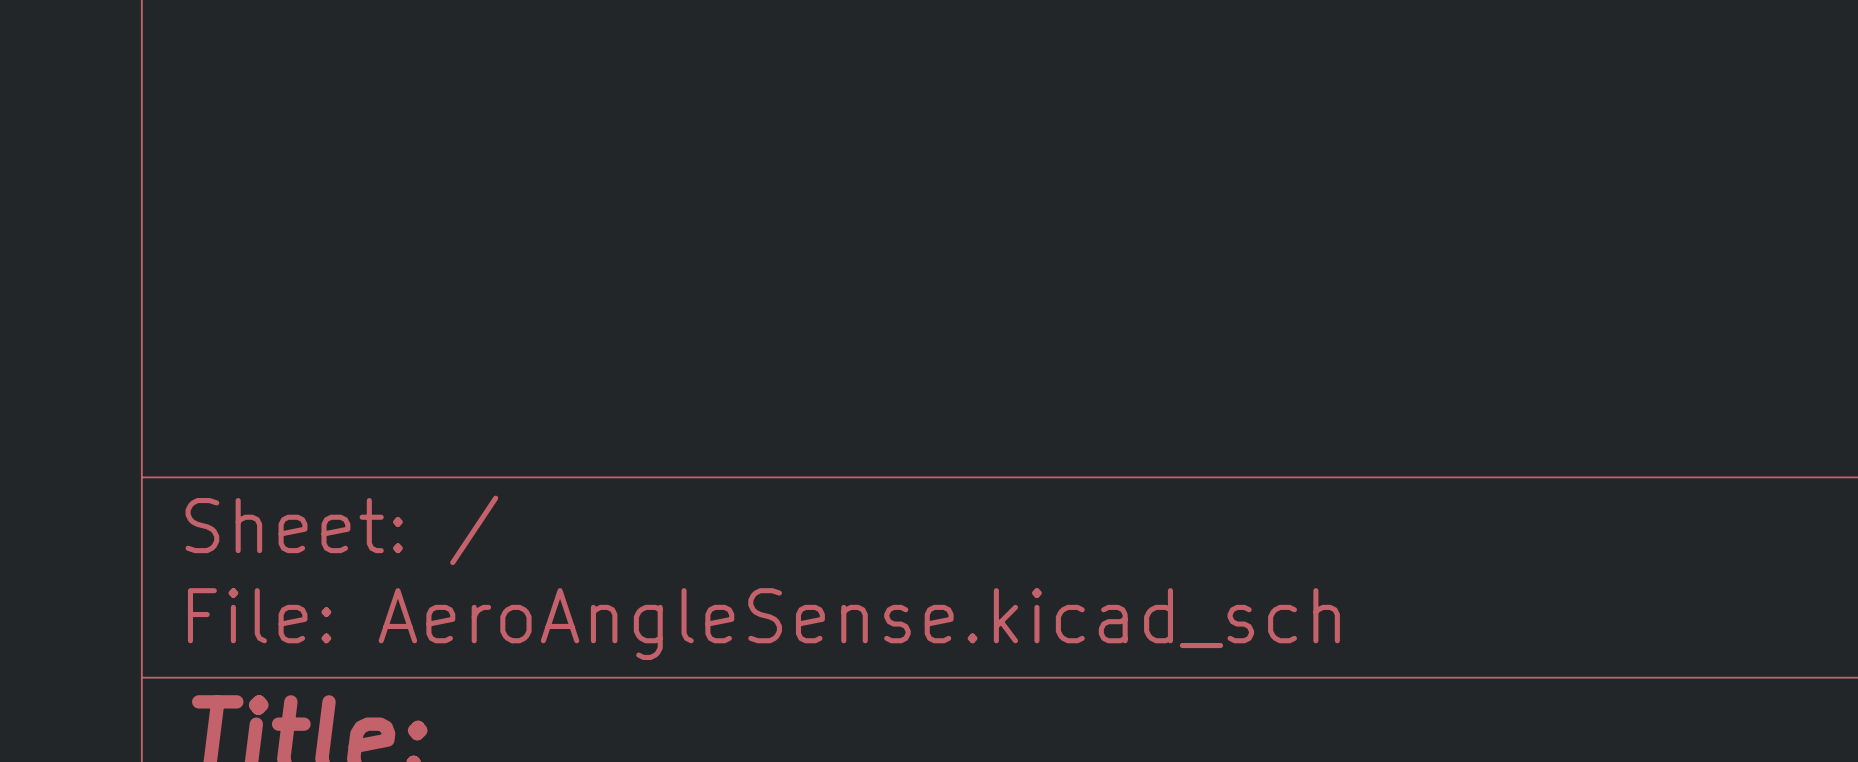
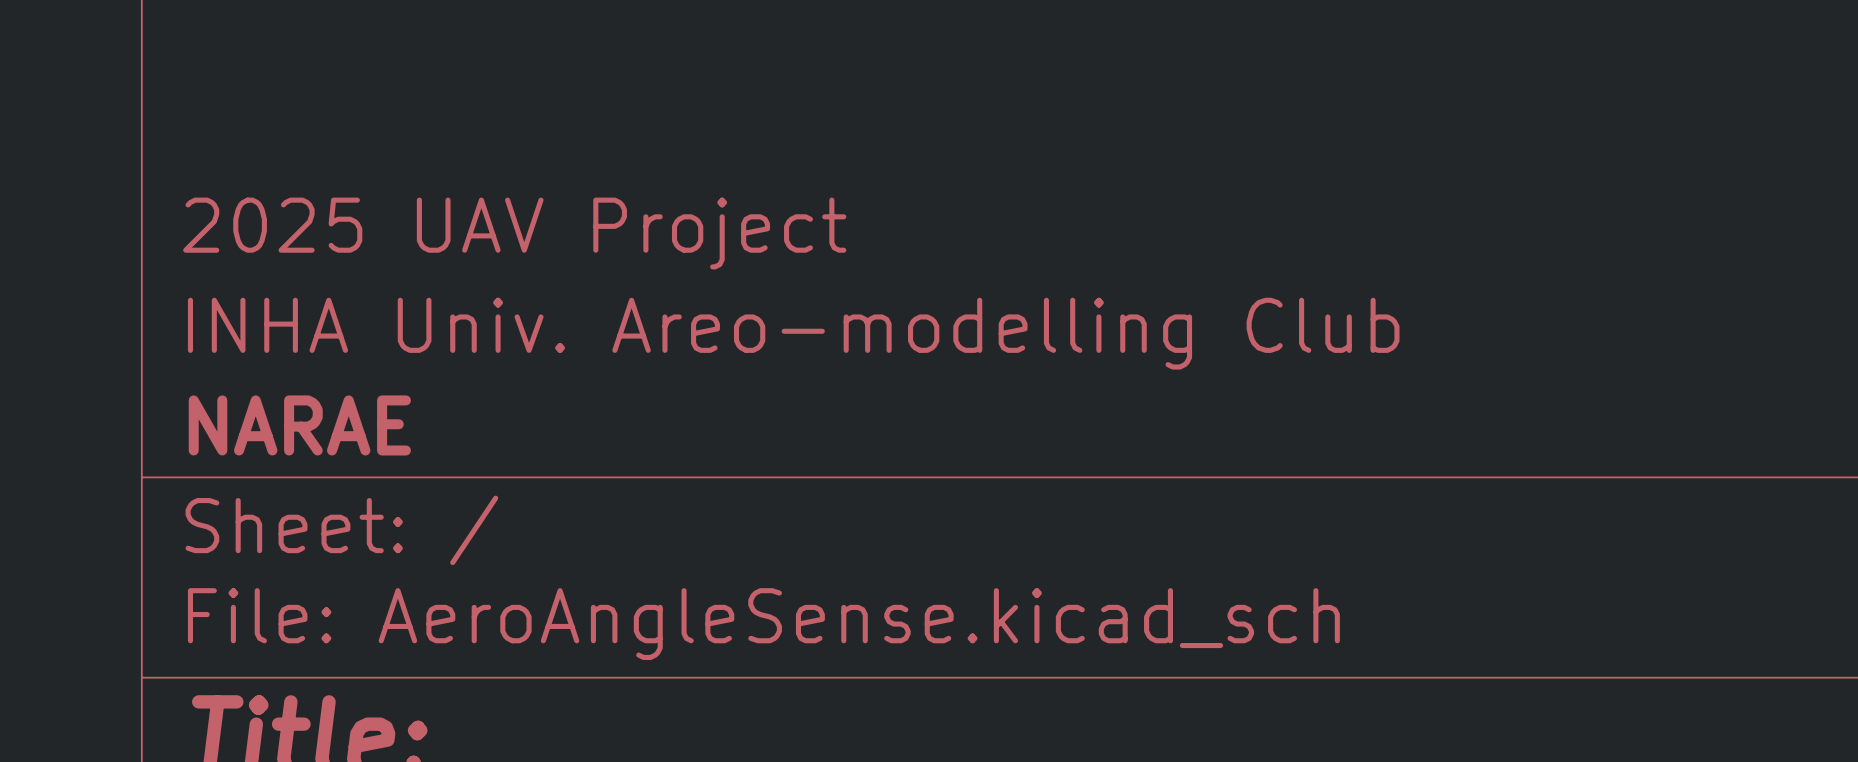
title block: none -> 2025 UAV Project (514, 233)
title block: none -> INHA Univ. Areo-modelling Club (793, 333)
title block: none -> NARAE (299, 425)

